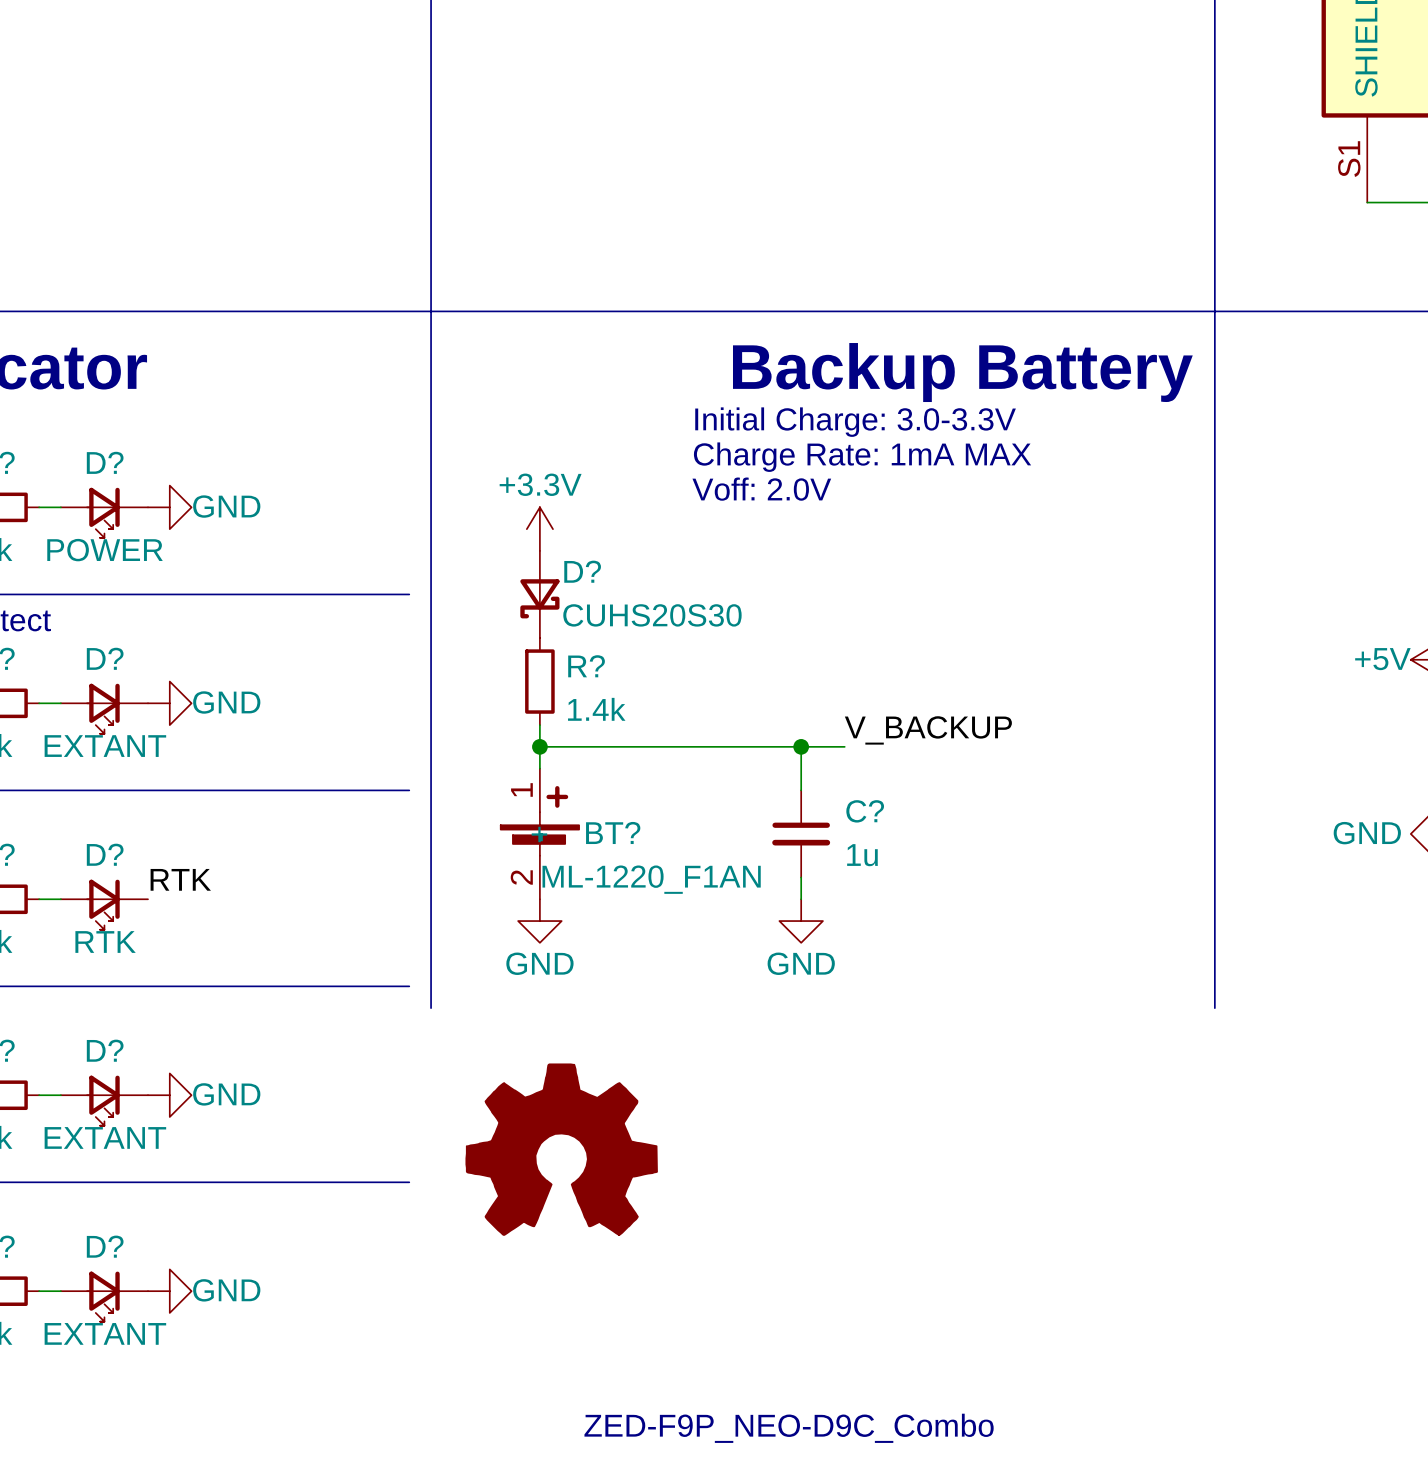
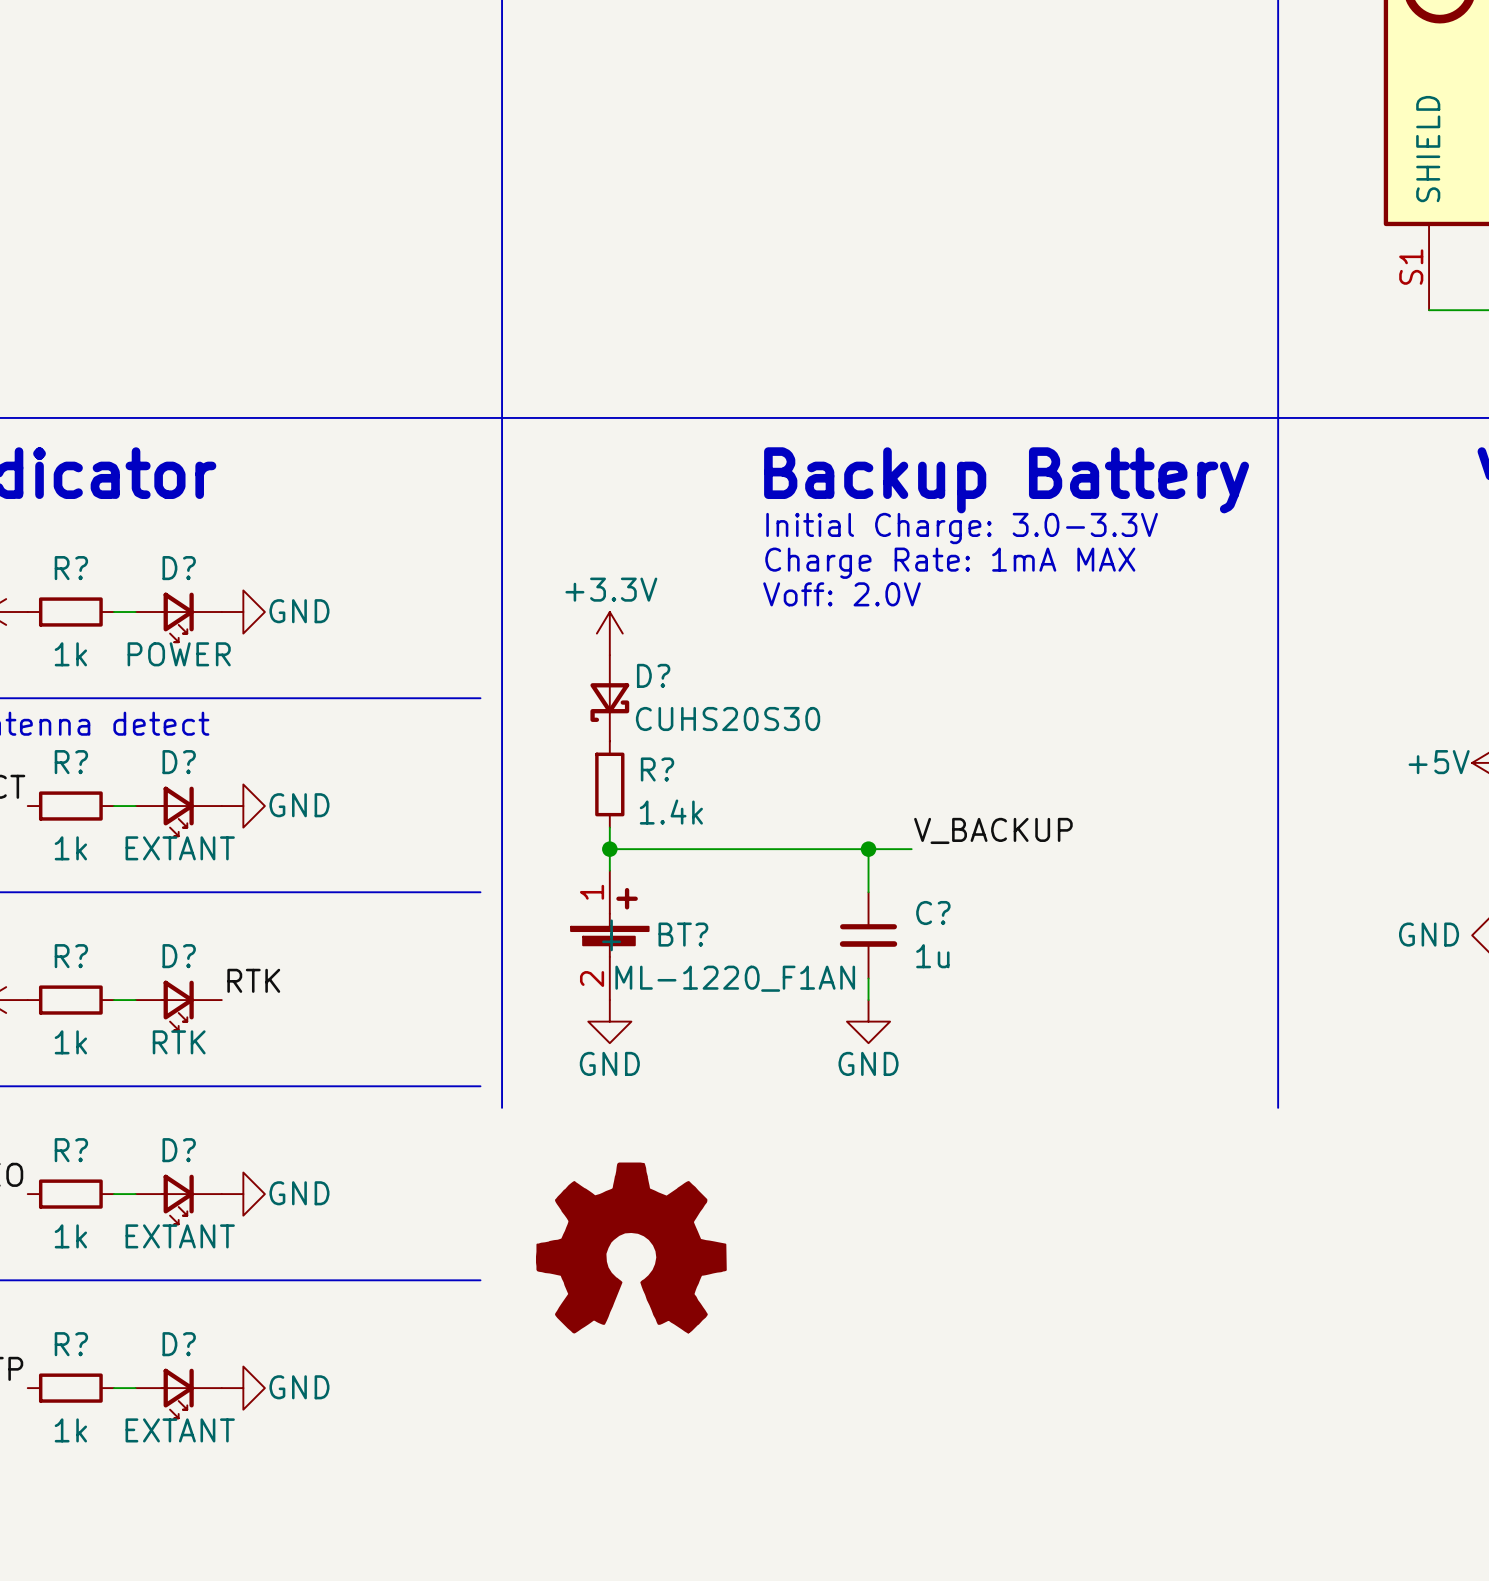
text: ZED-F9P_NEO-D9C_Combo (789, 1428) -> none

